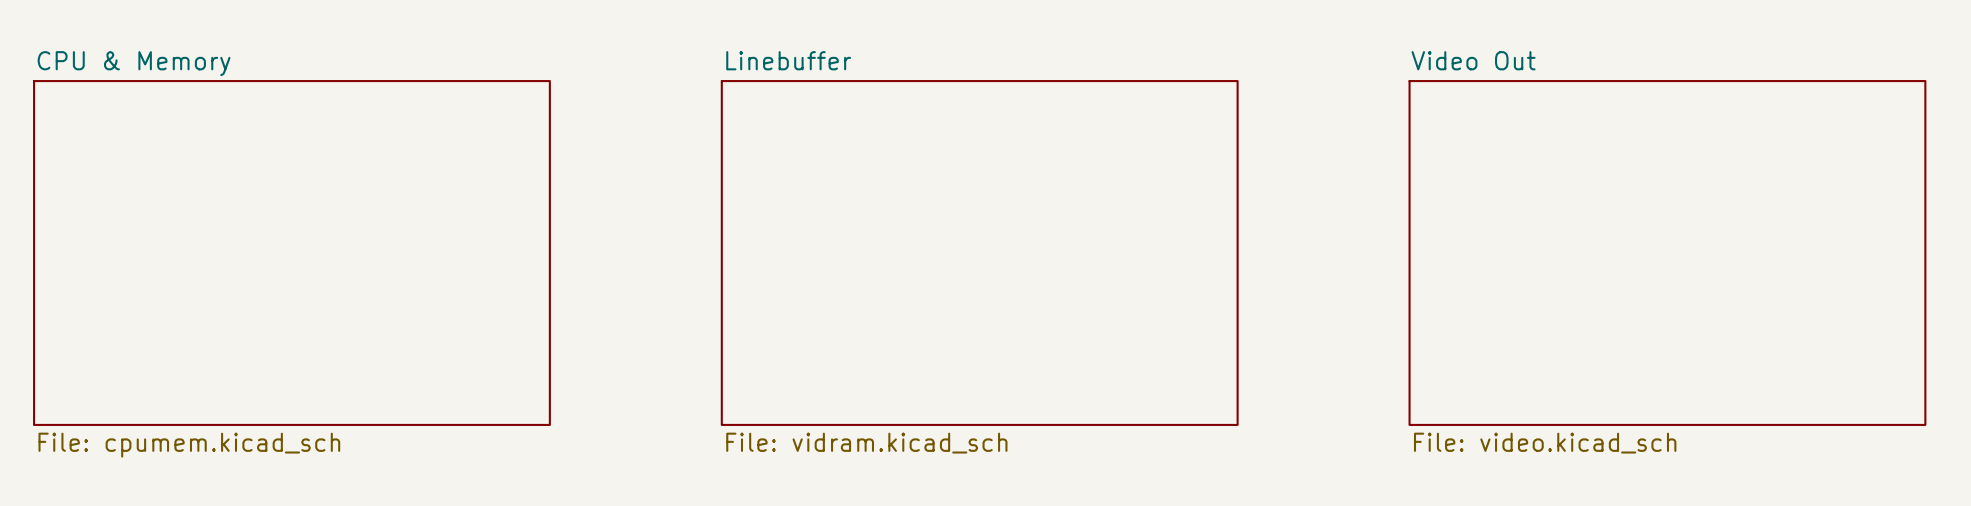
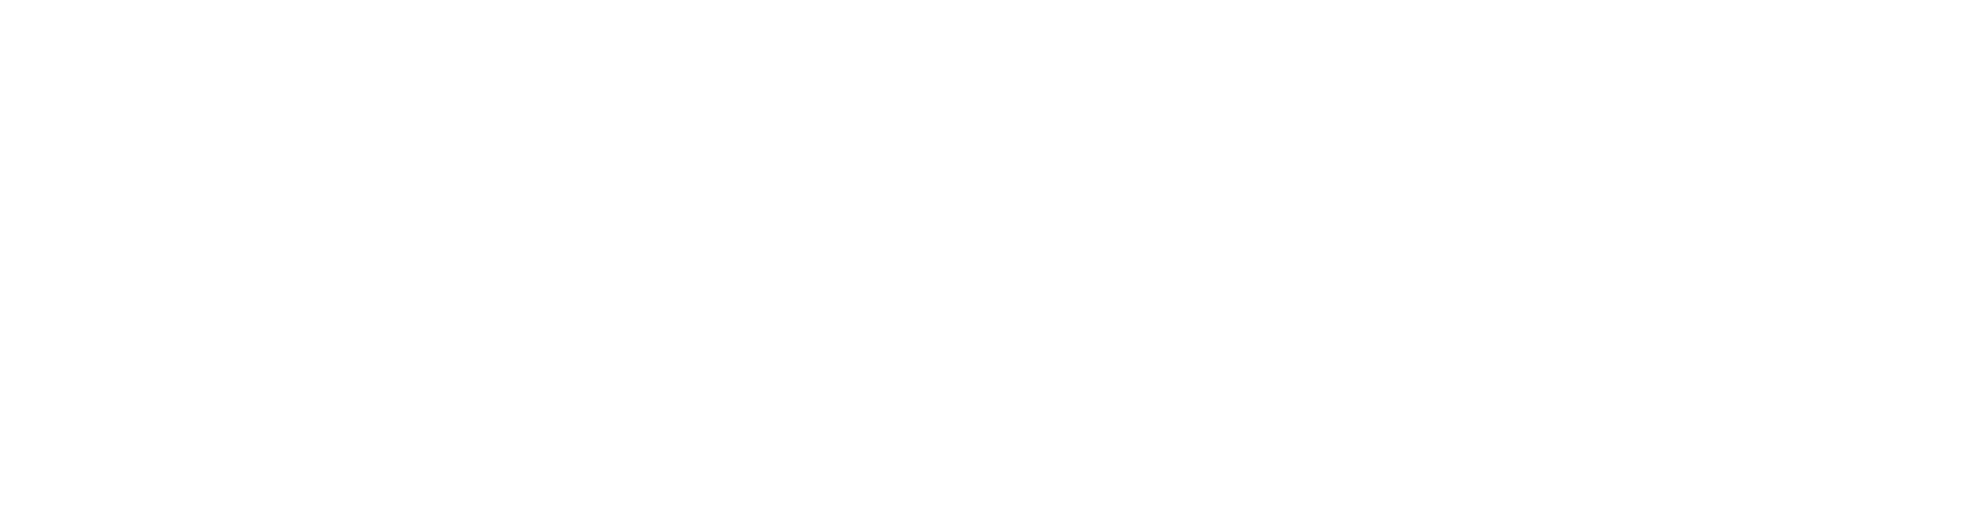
sheet CPU & Memory: File: cpumem.kicad_sch (291, 253) -> none
sheet Linebuffer: File: vidram.kicad_sch (979, 253) -> none
sheet Video Out: File: video.kicad_sch (1667, 253) -> none

